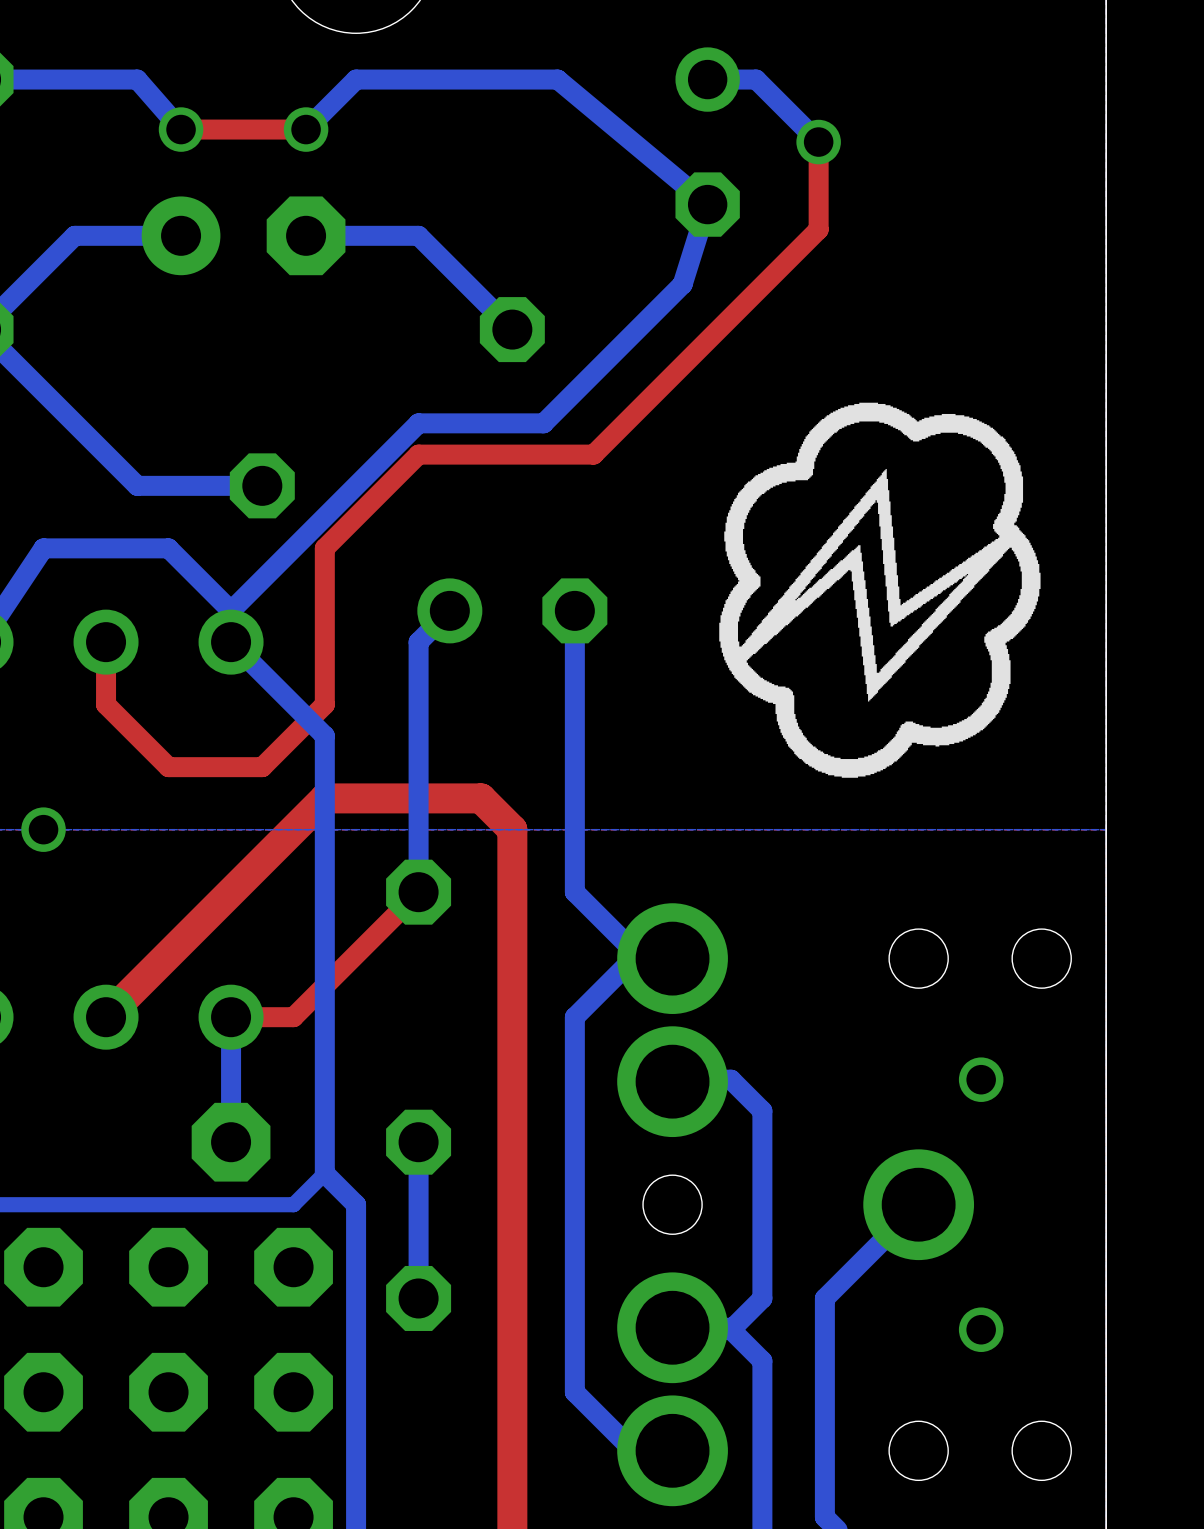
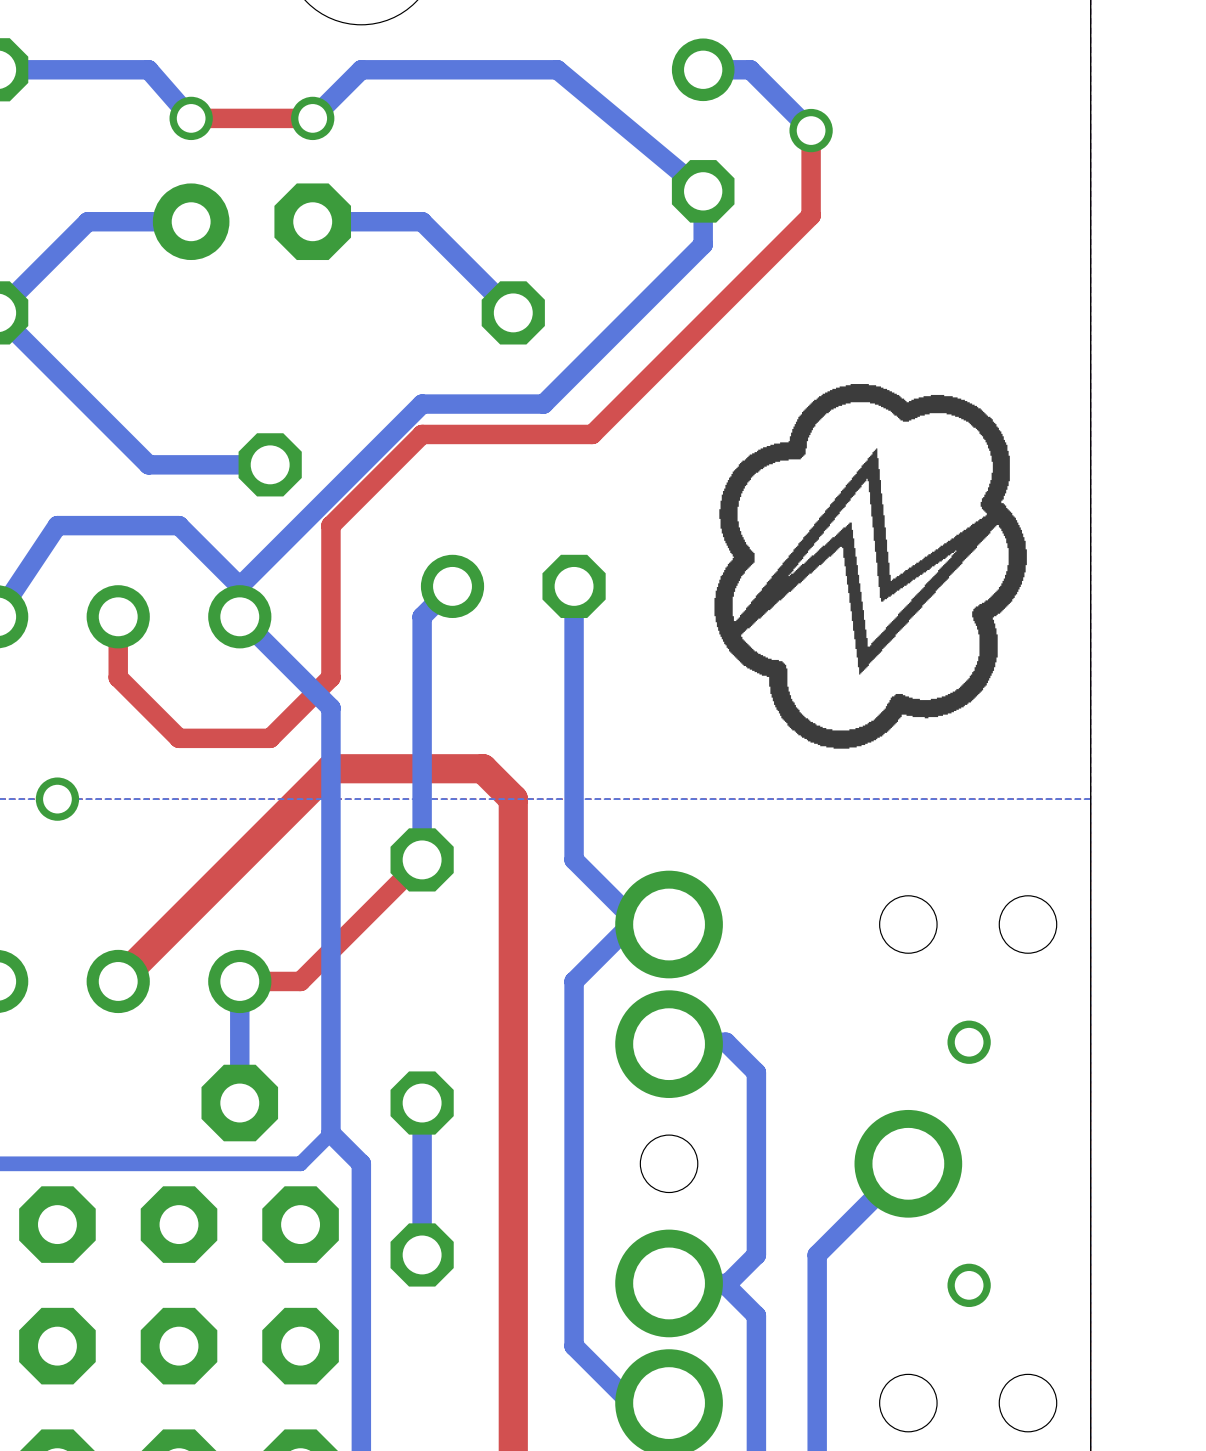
bottom track: (707, 204) (682, 284) -> (703, 191) (703, 244) (678, 268)

